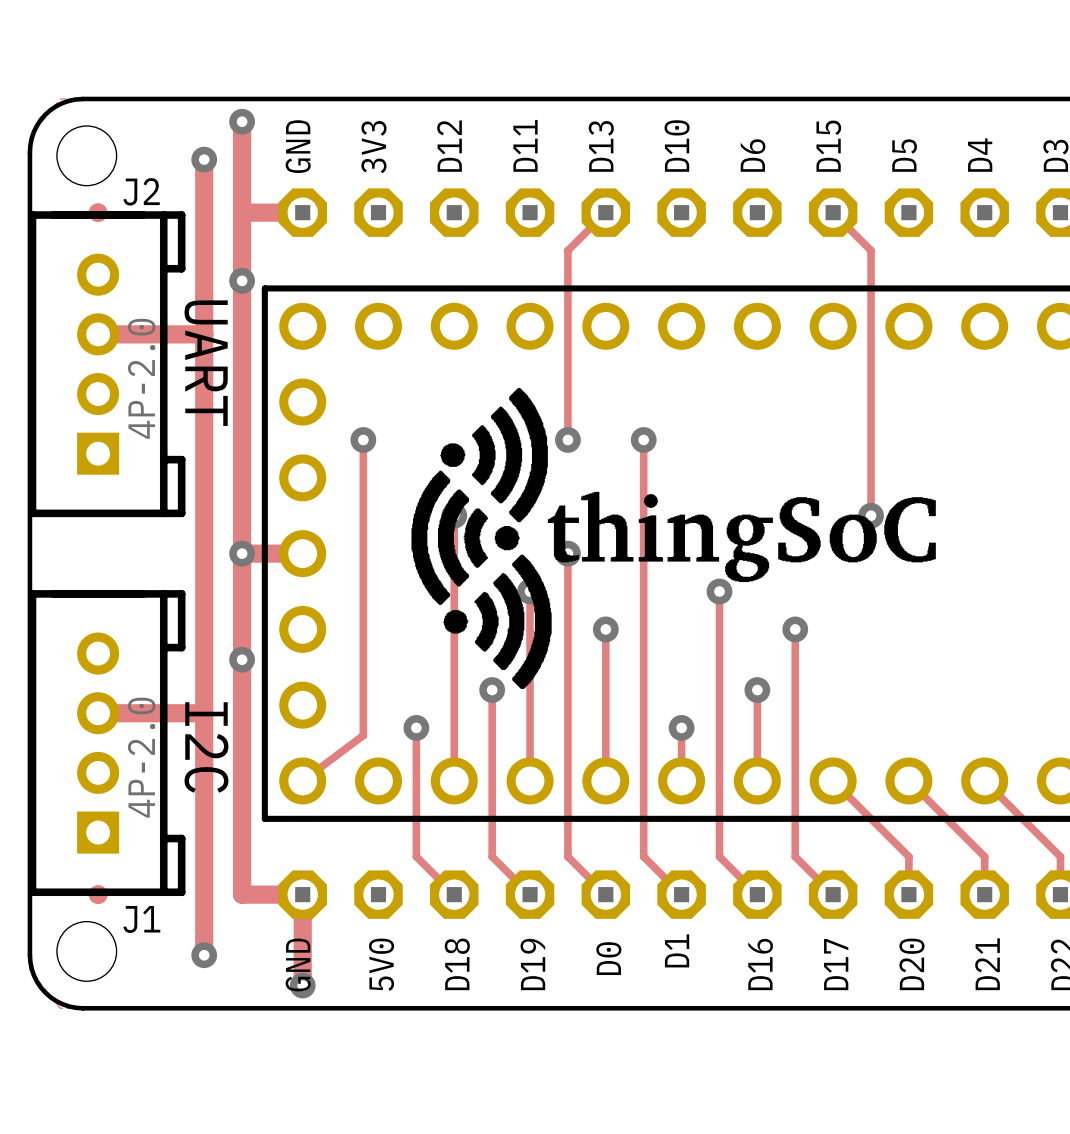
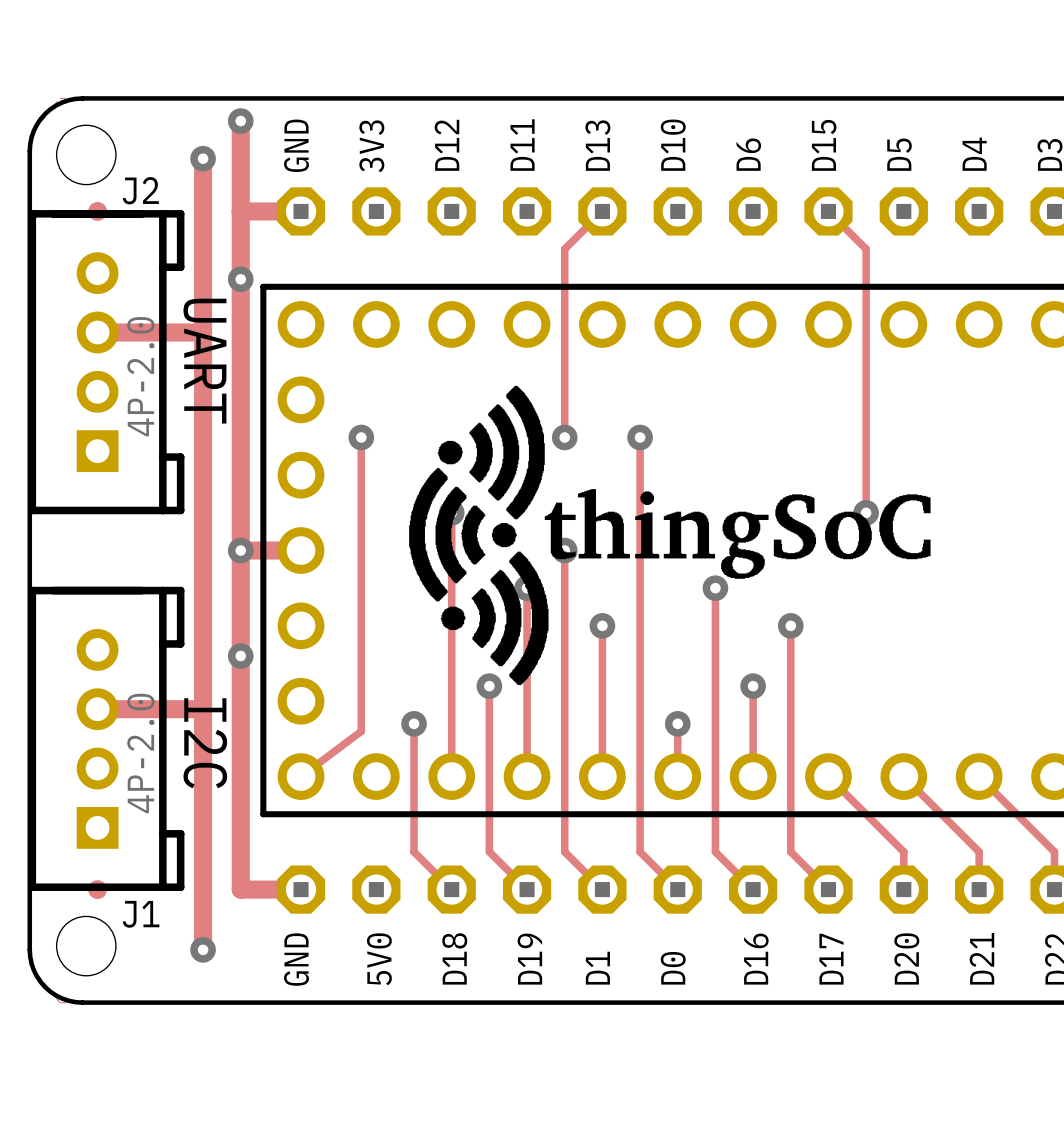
track: (302, 894) (302, 985) -> none
text: D1 (677, 950) -> D0 (673, 968)
text: D0 (608, 958) -> D1 (597, 968)
via: (302, 985) -> none

